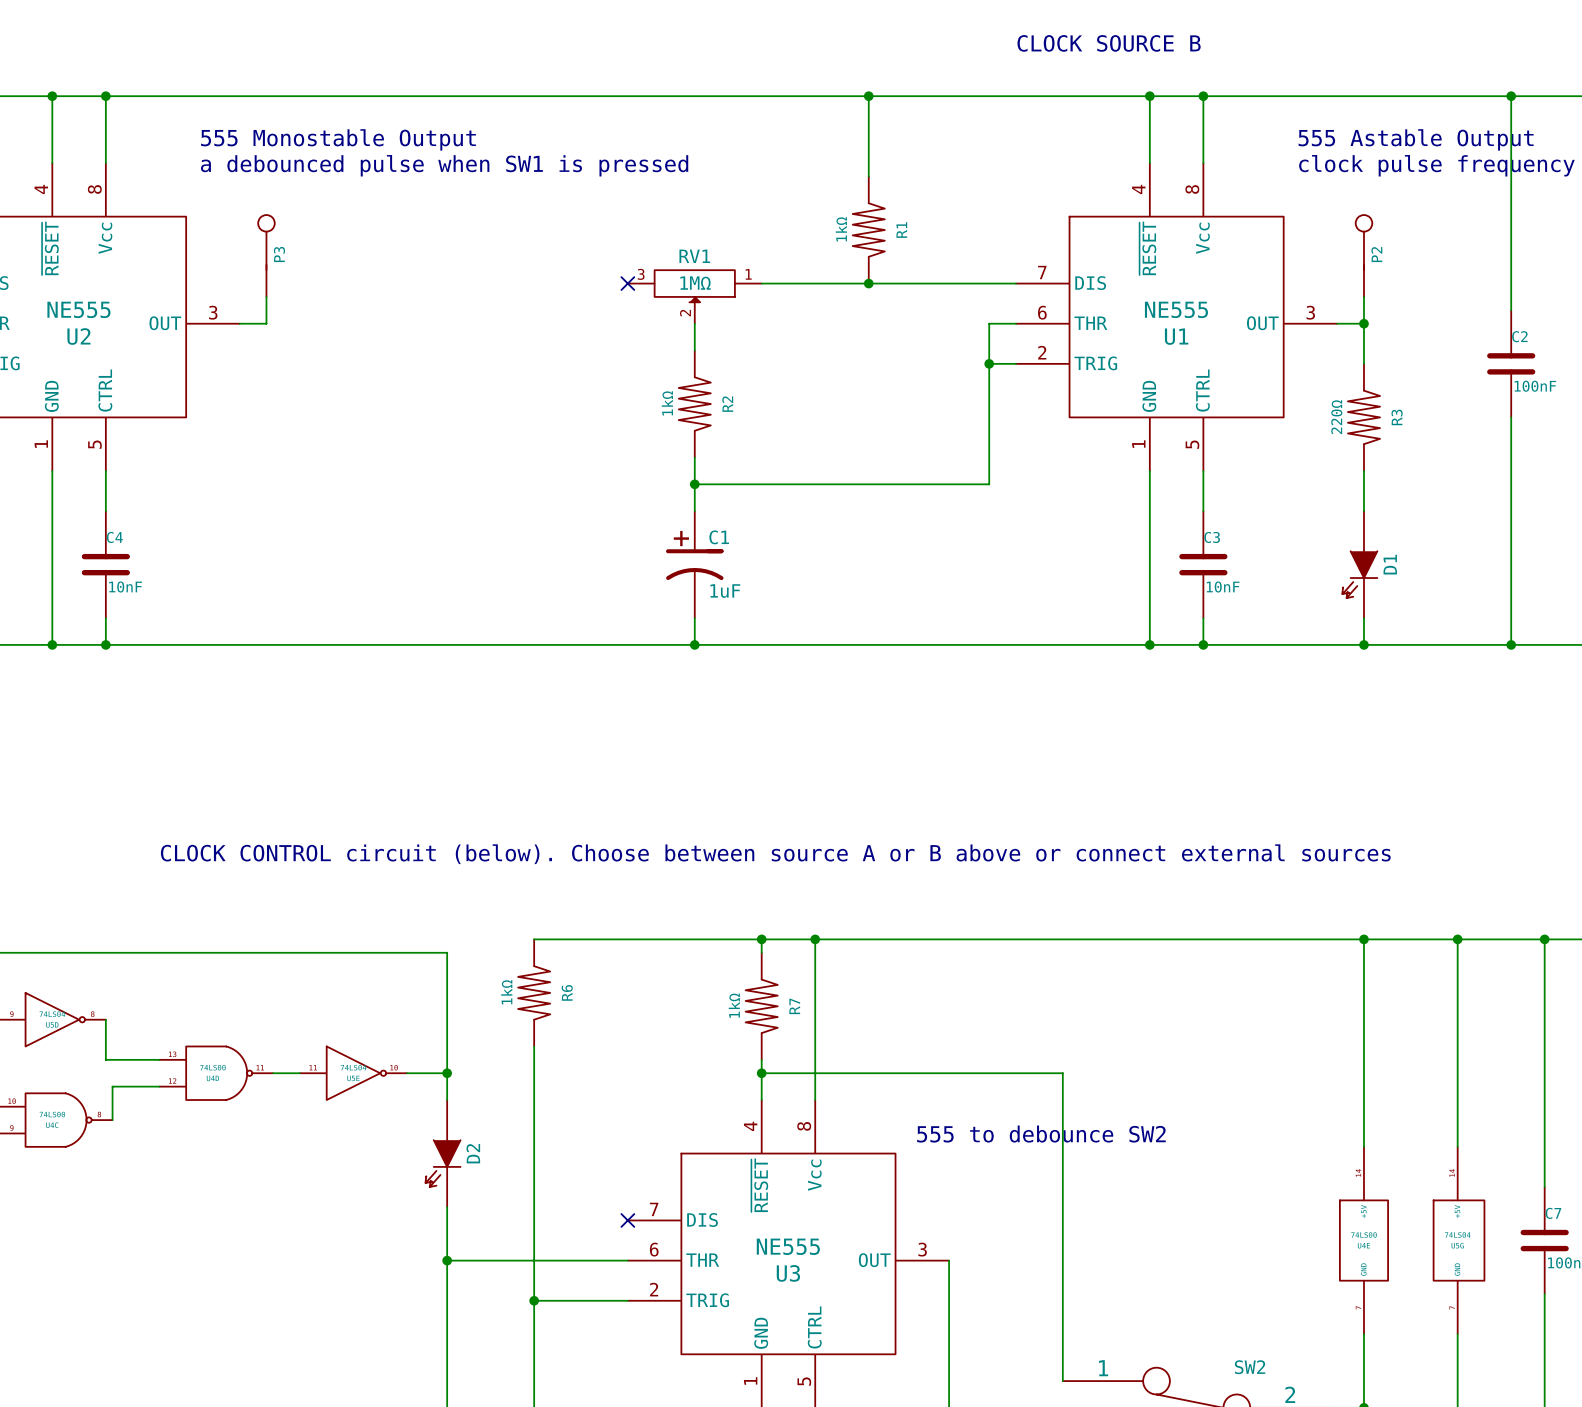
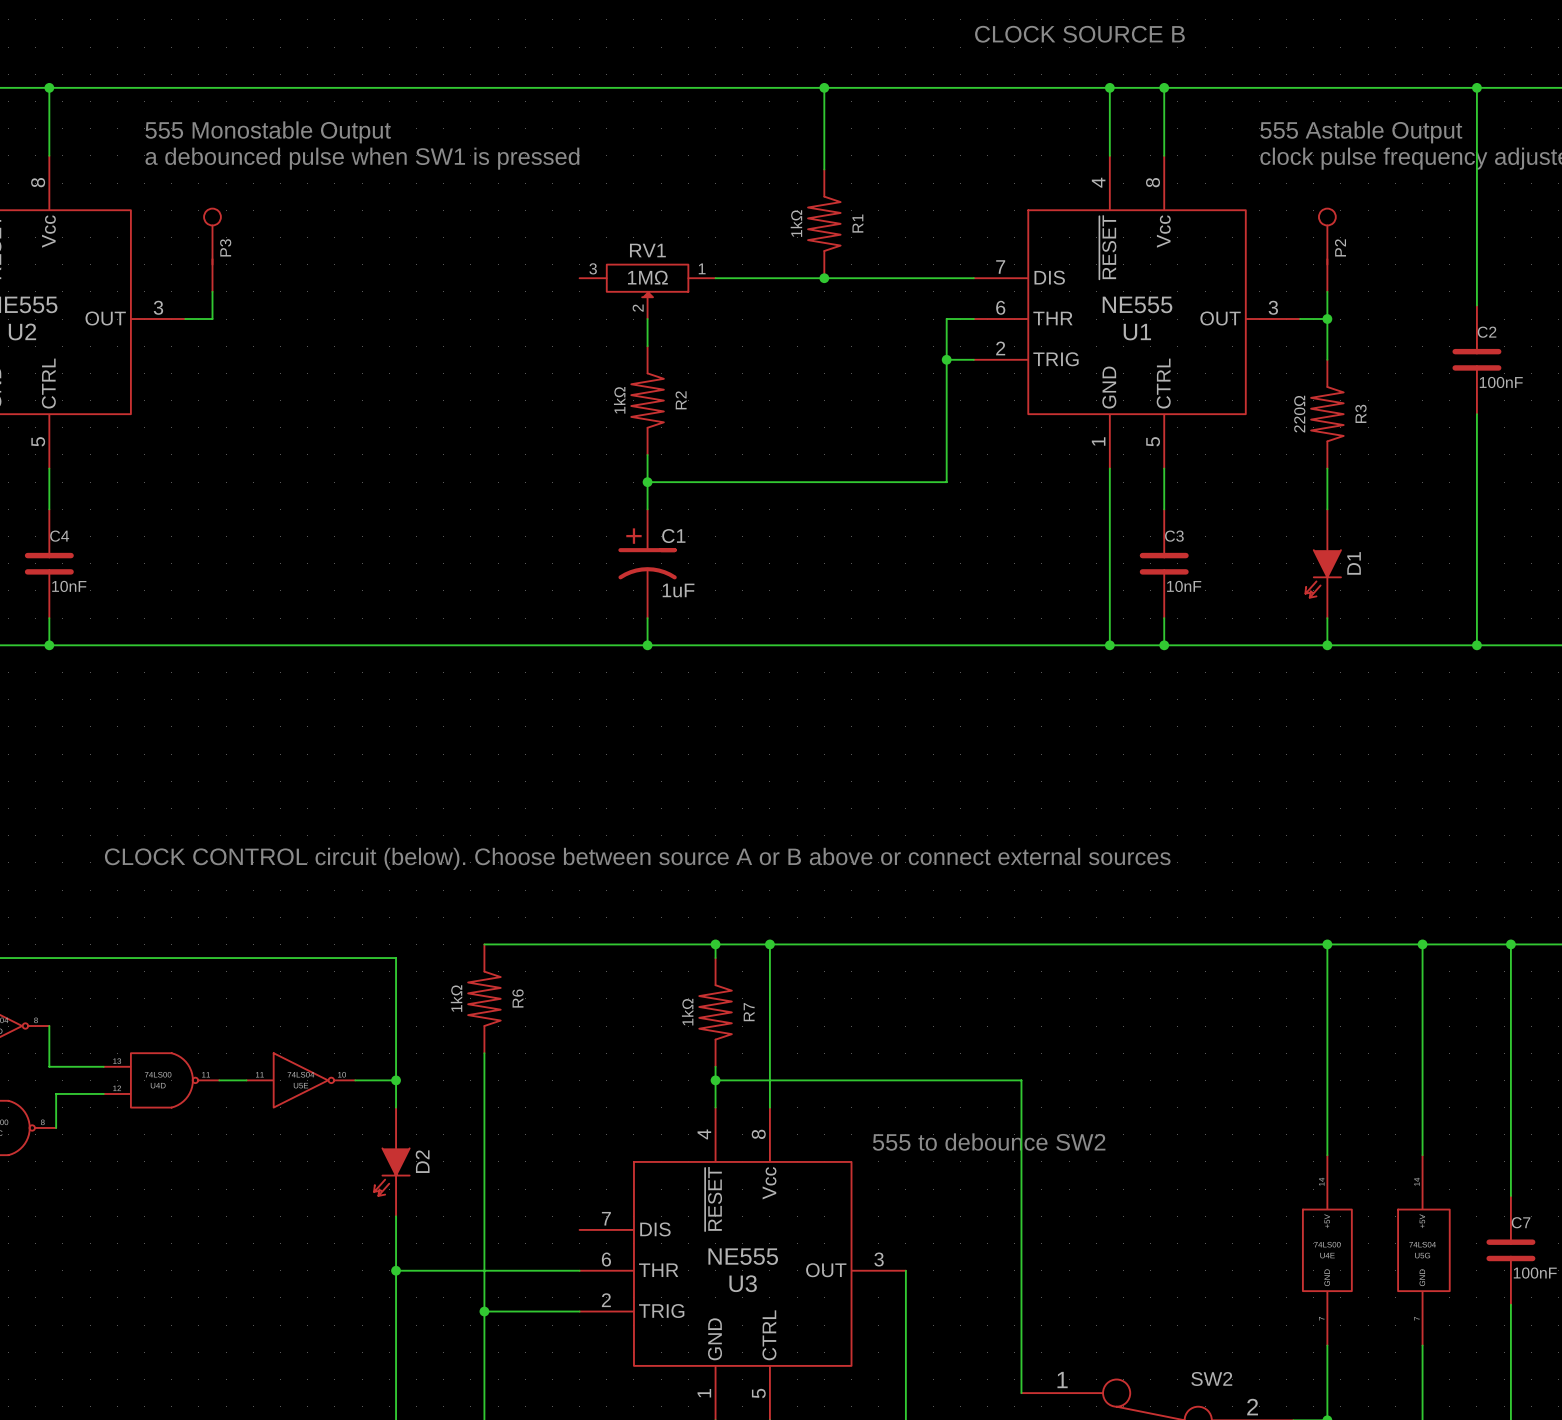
no-connect mark: (627, 283) -> none
no-connect mark: (627, 1220) -> none

